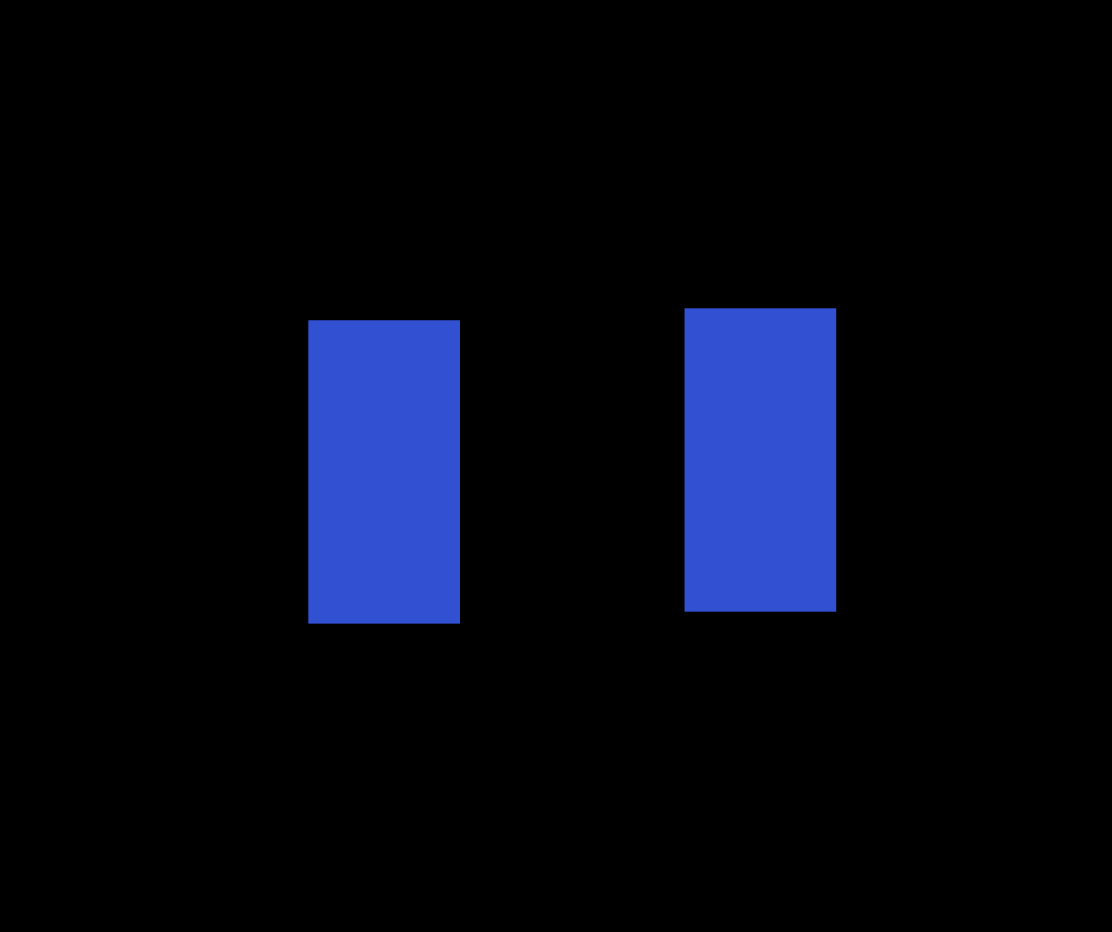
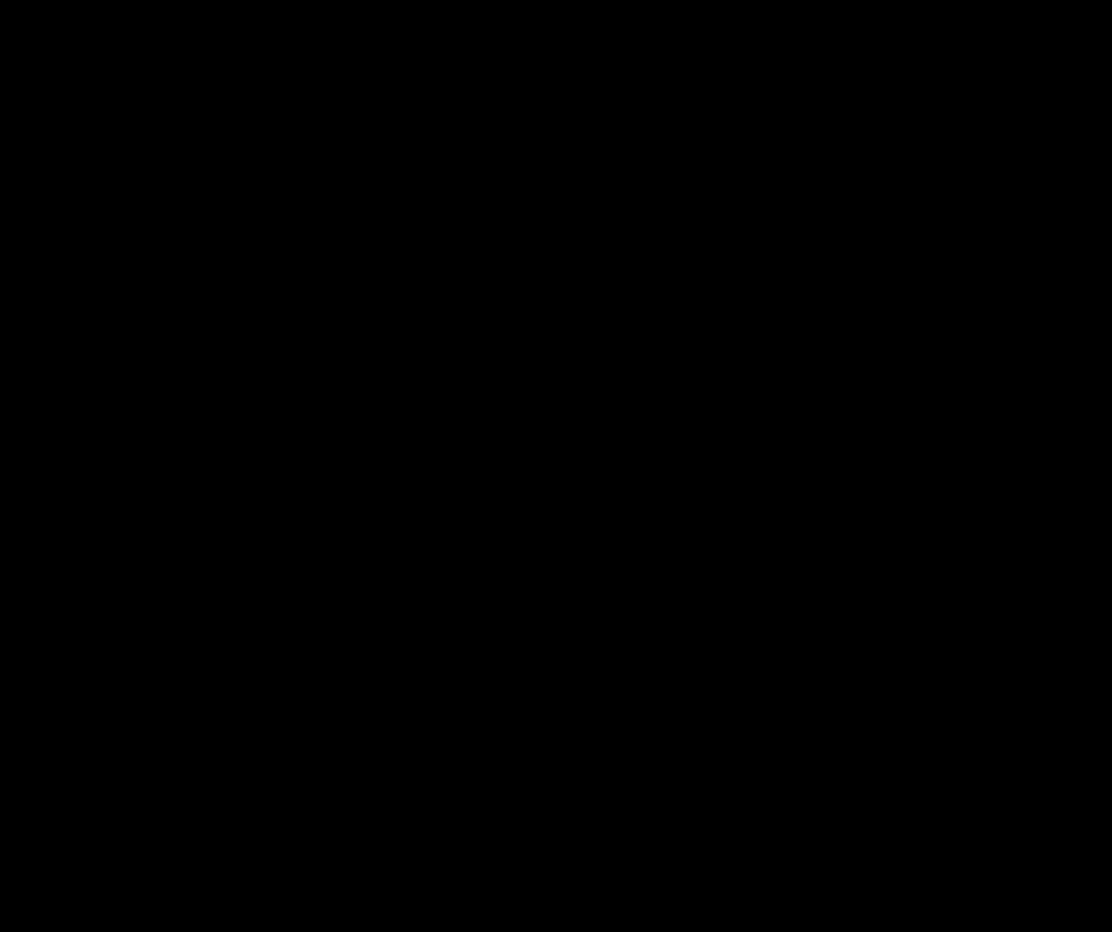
part: (760, 459) -> none
part: (384, 471) -> none

